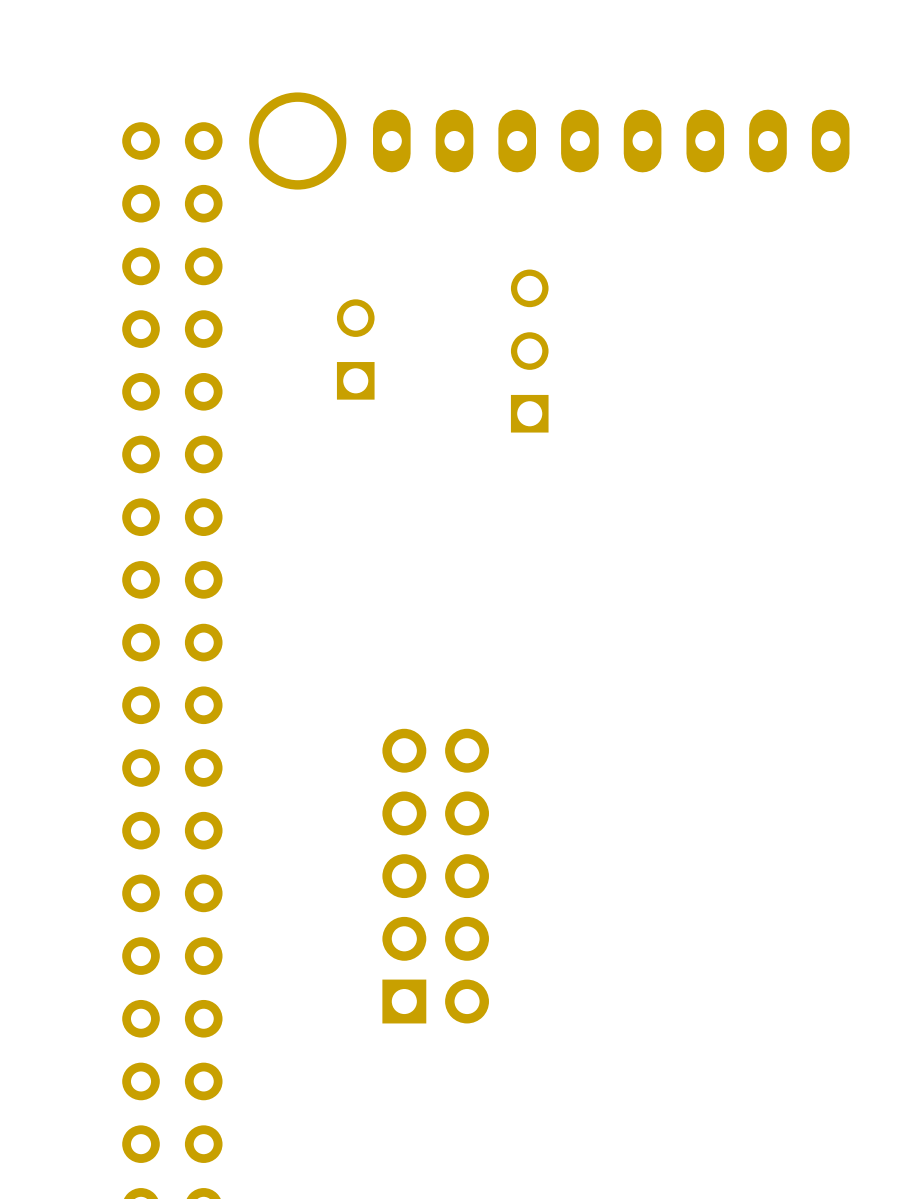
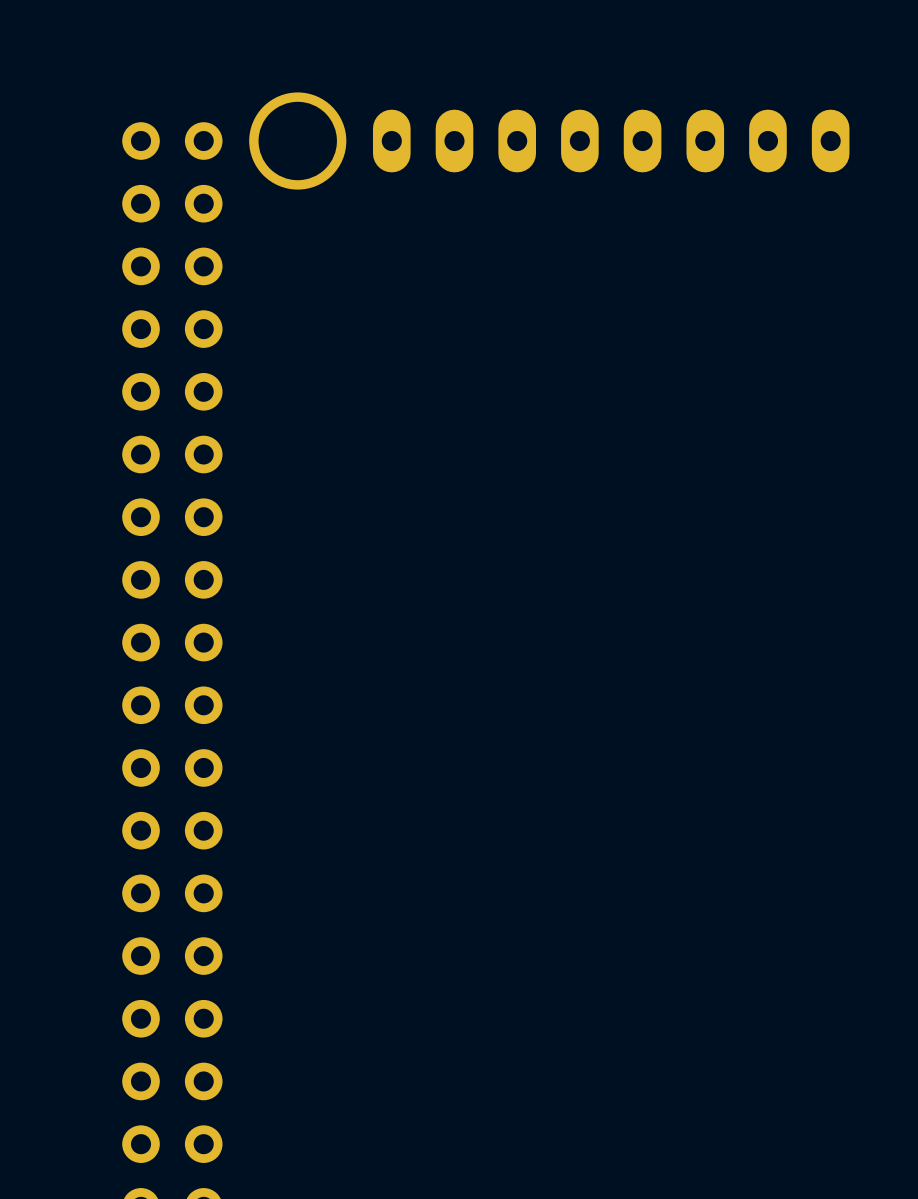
part: (355, 349) -> none
part: (529, 351) -> none
part: (435, 876) -> none

